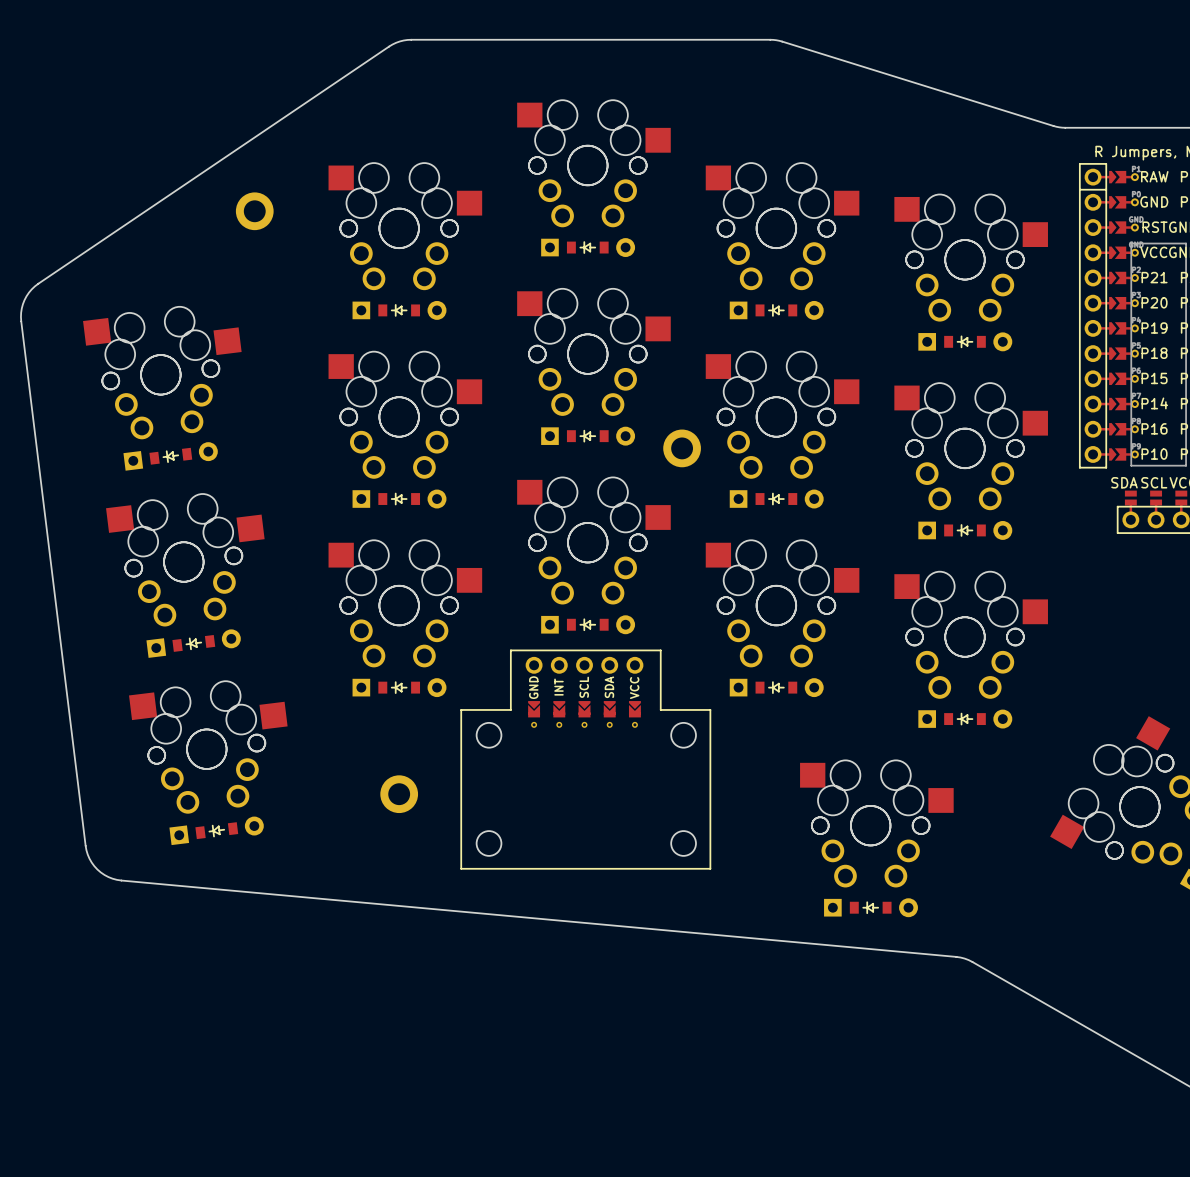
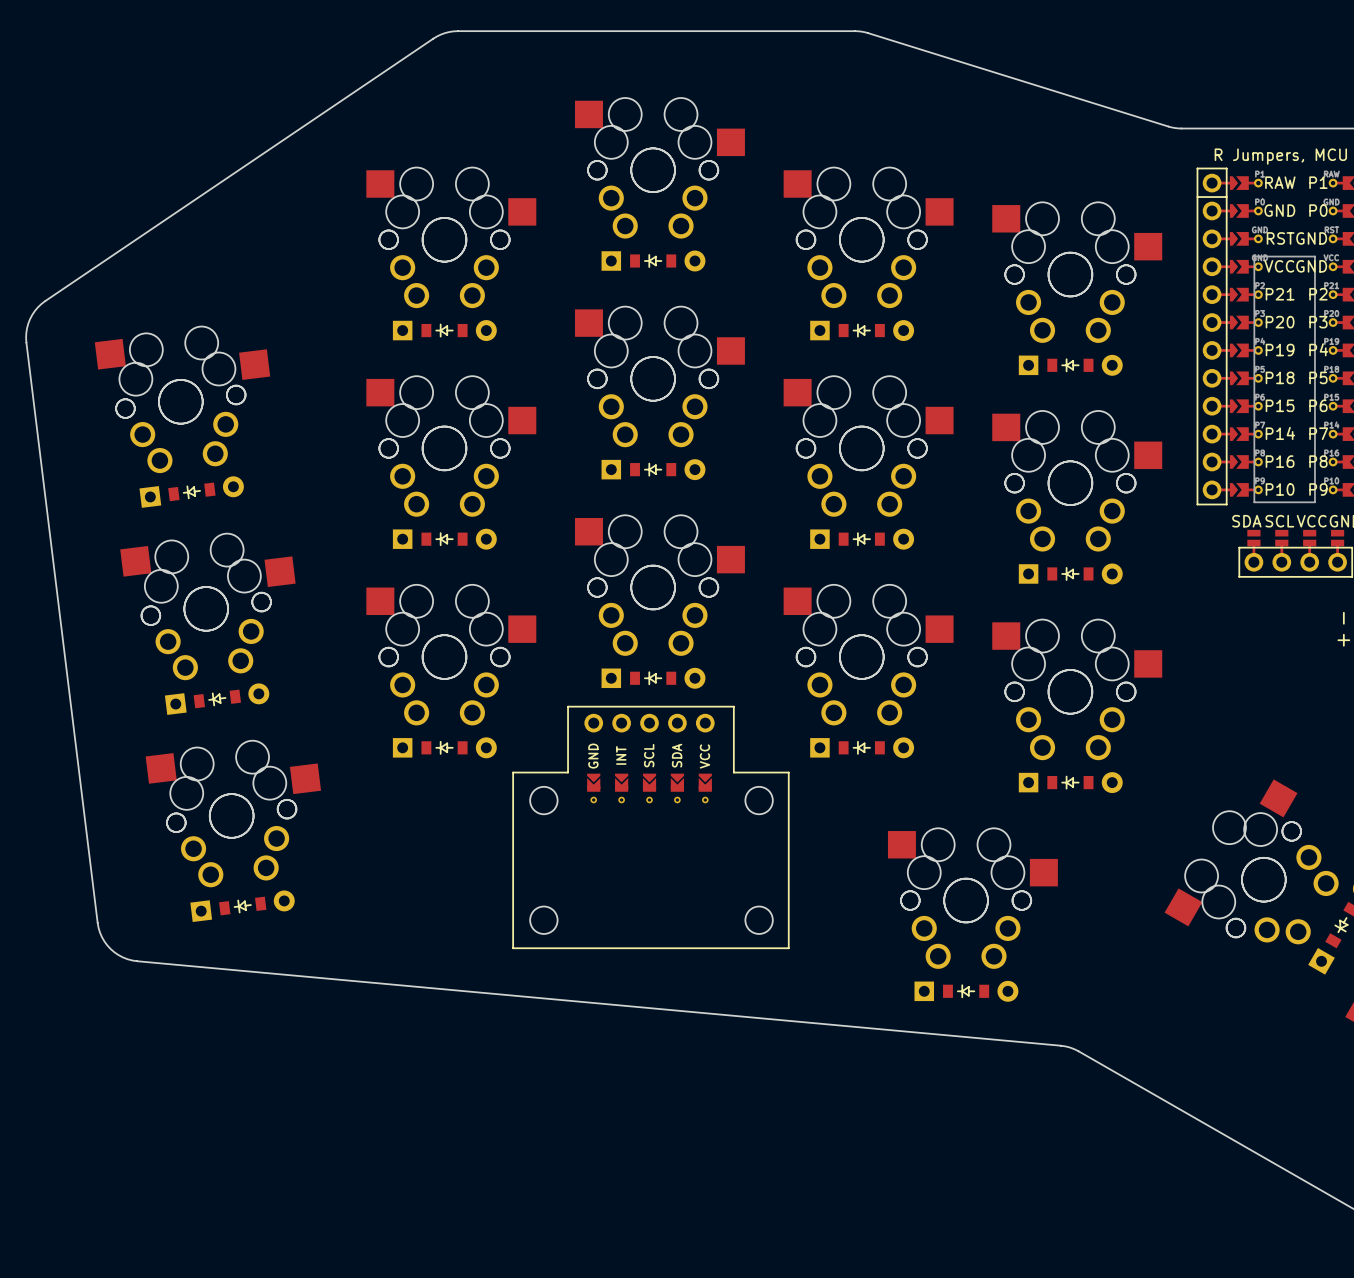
part: (254, 211) -> none
part: (682, 448) -> none
part footprint: [460, 649, 711, 870] -> [512, 706, 790, 949]
part: (399, 794) -> none

